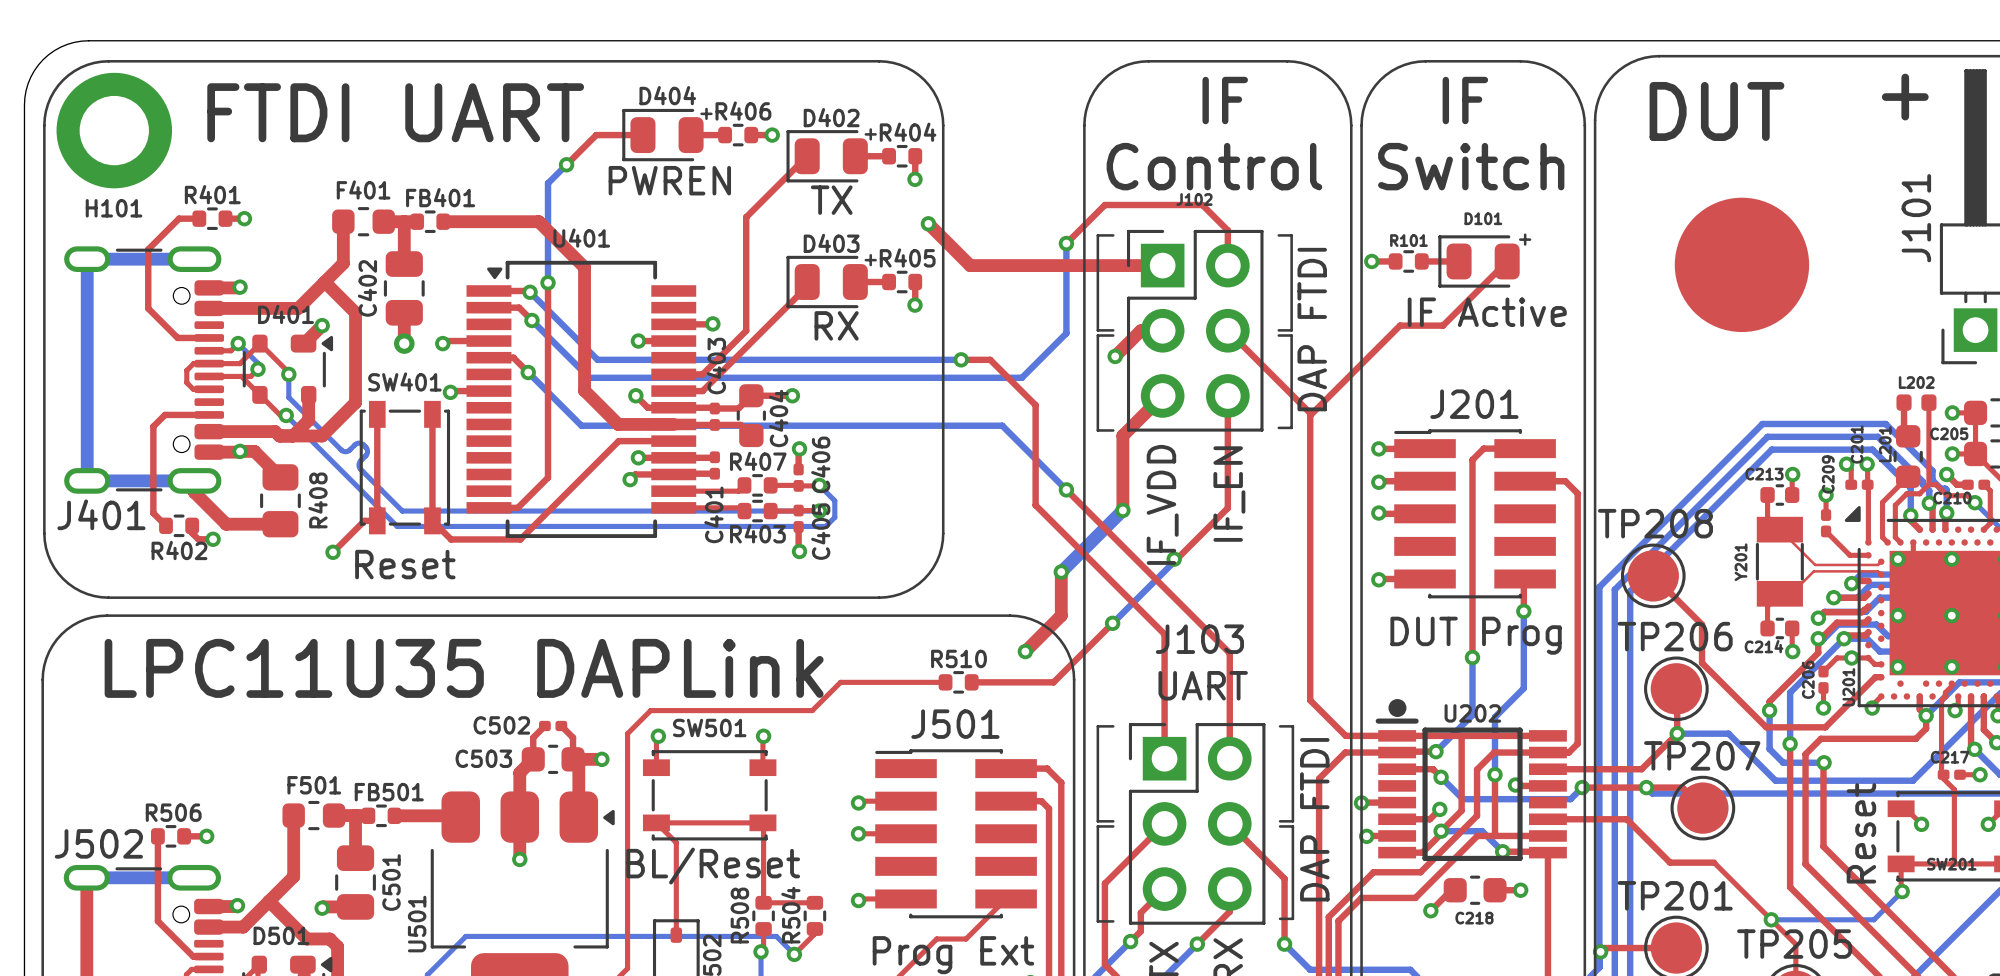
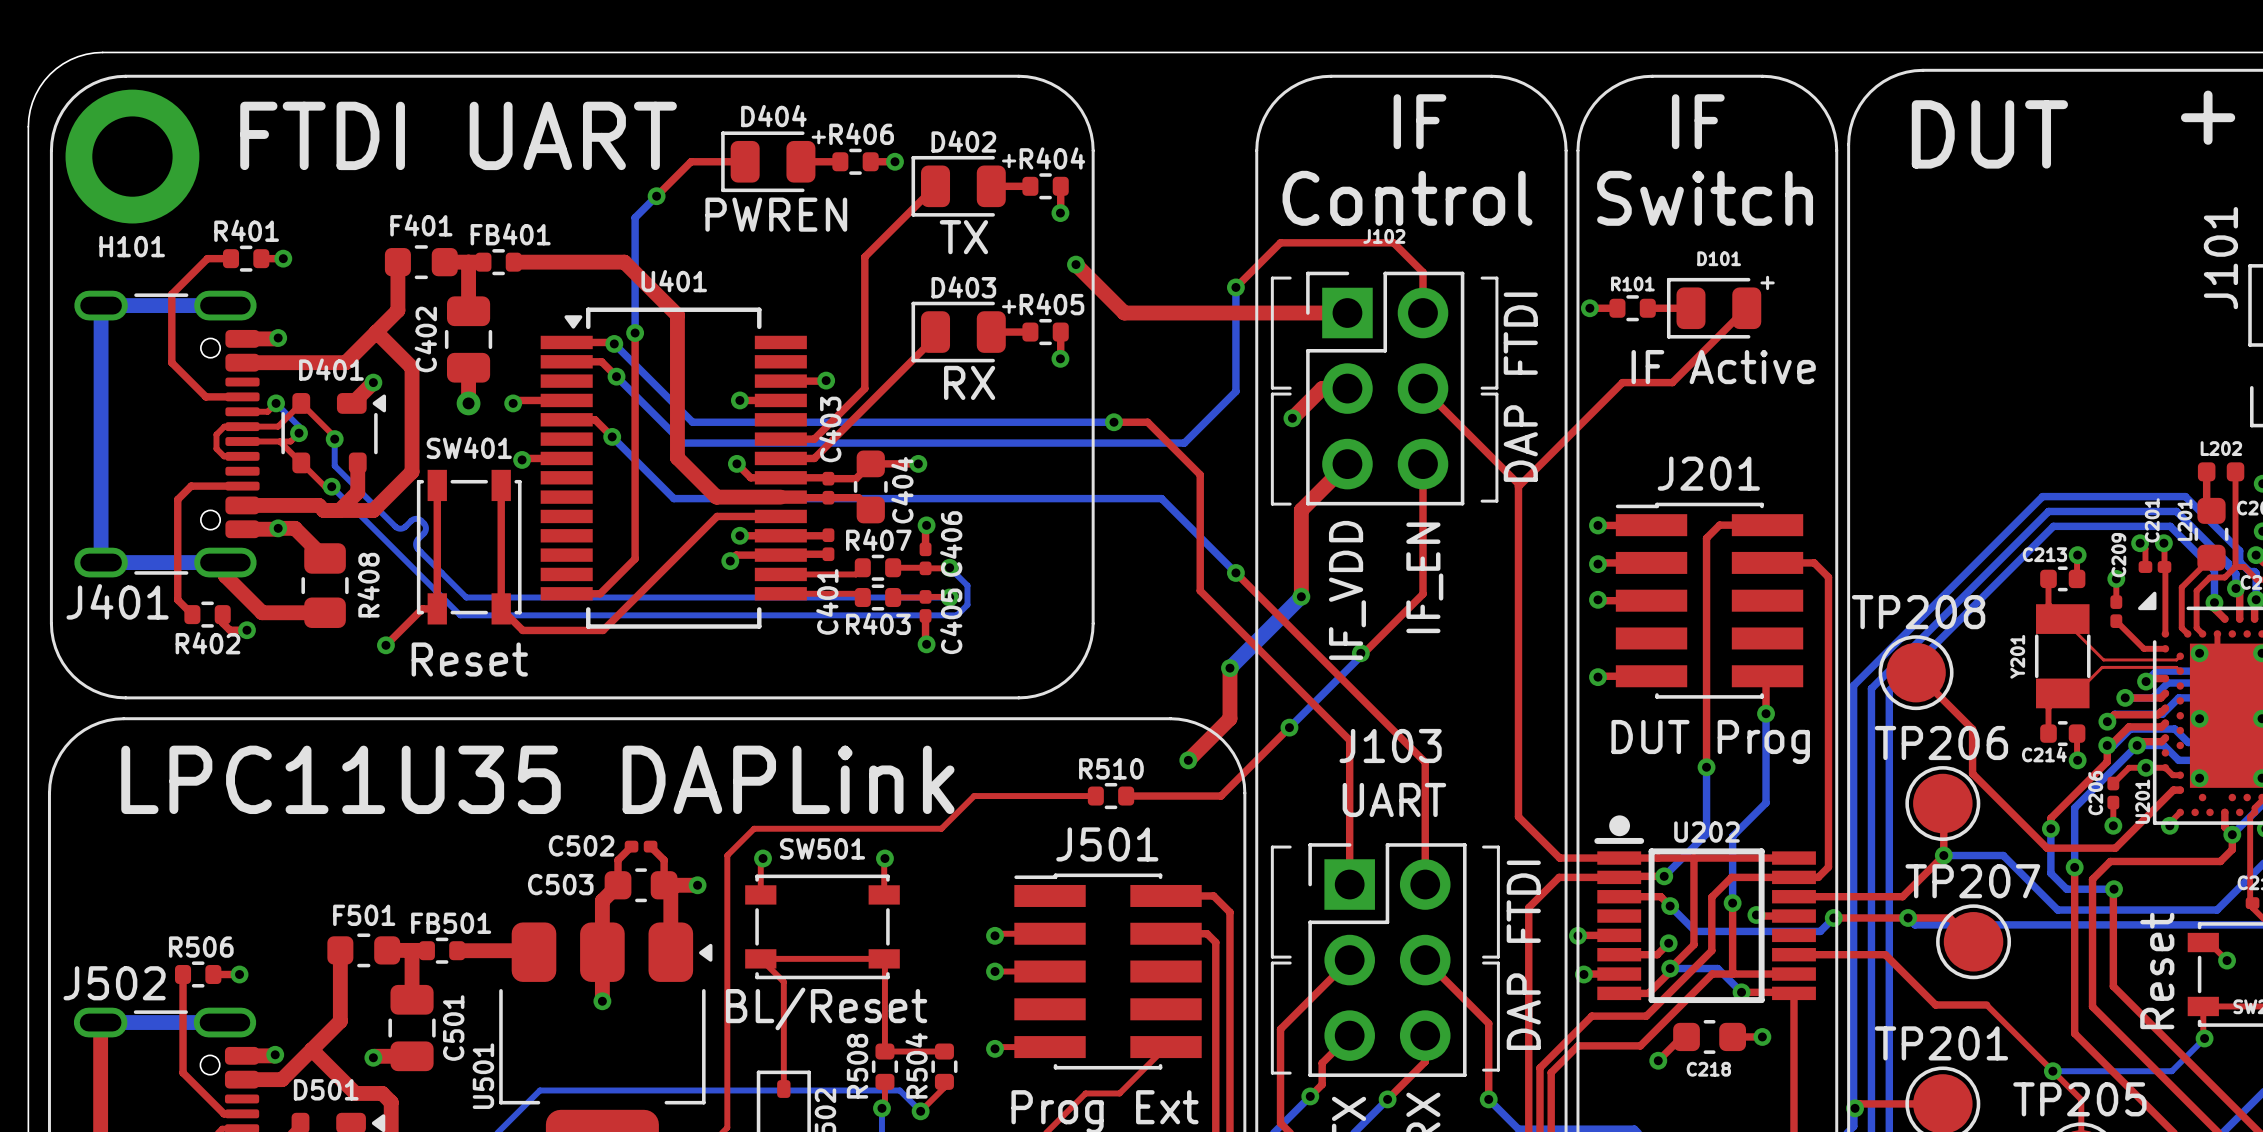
drawing: [1674, 197, 1810, 333] -> none

